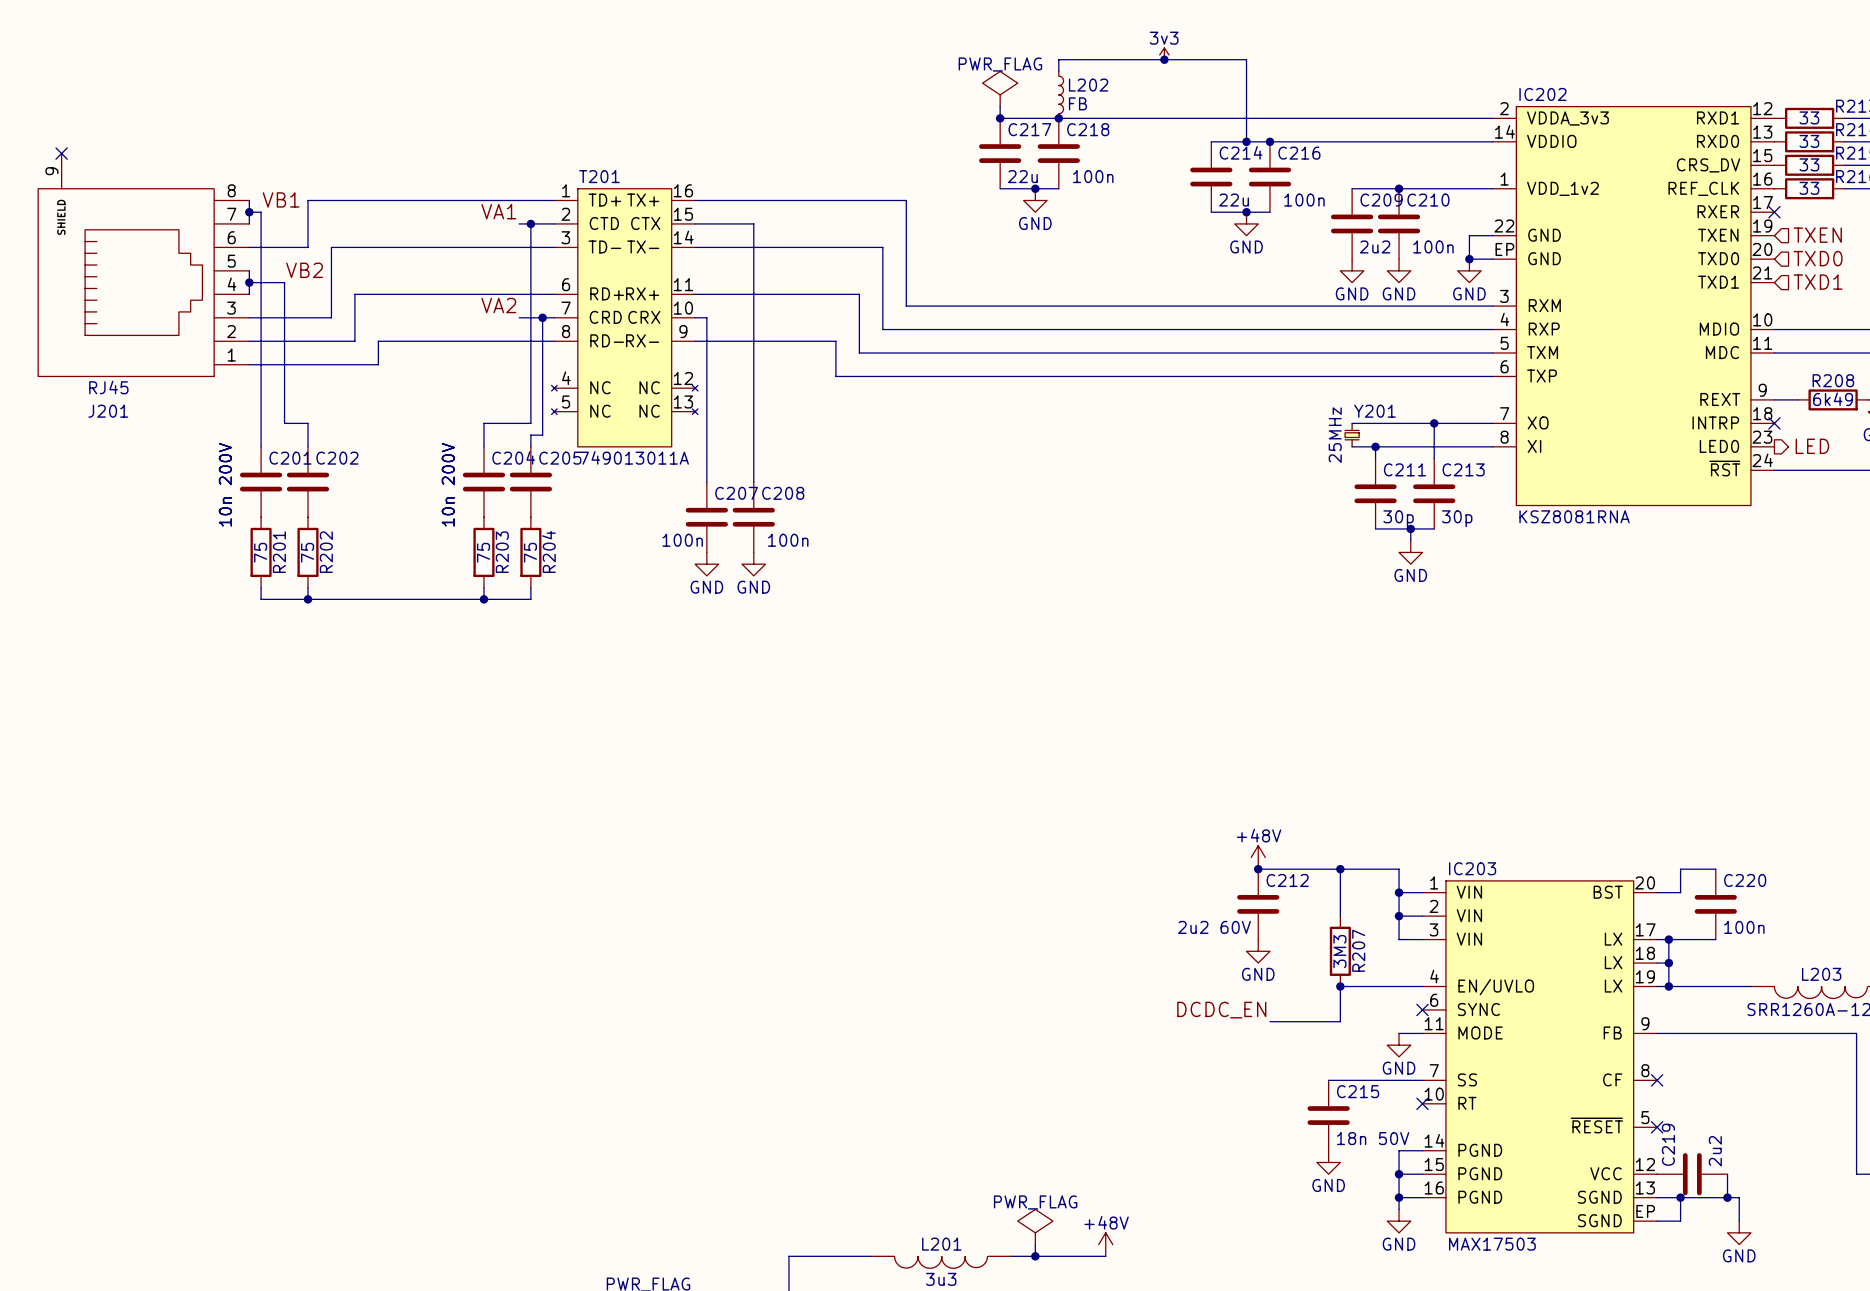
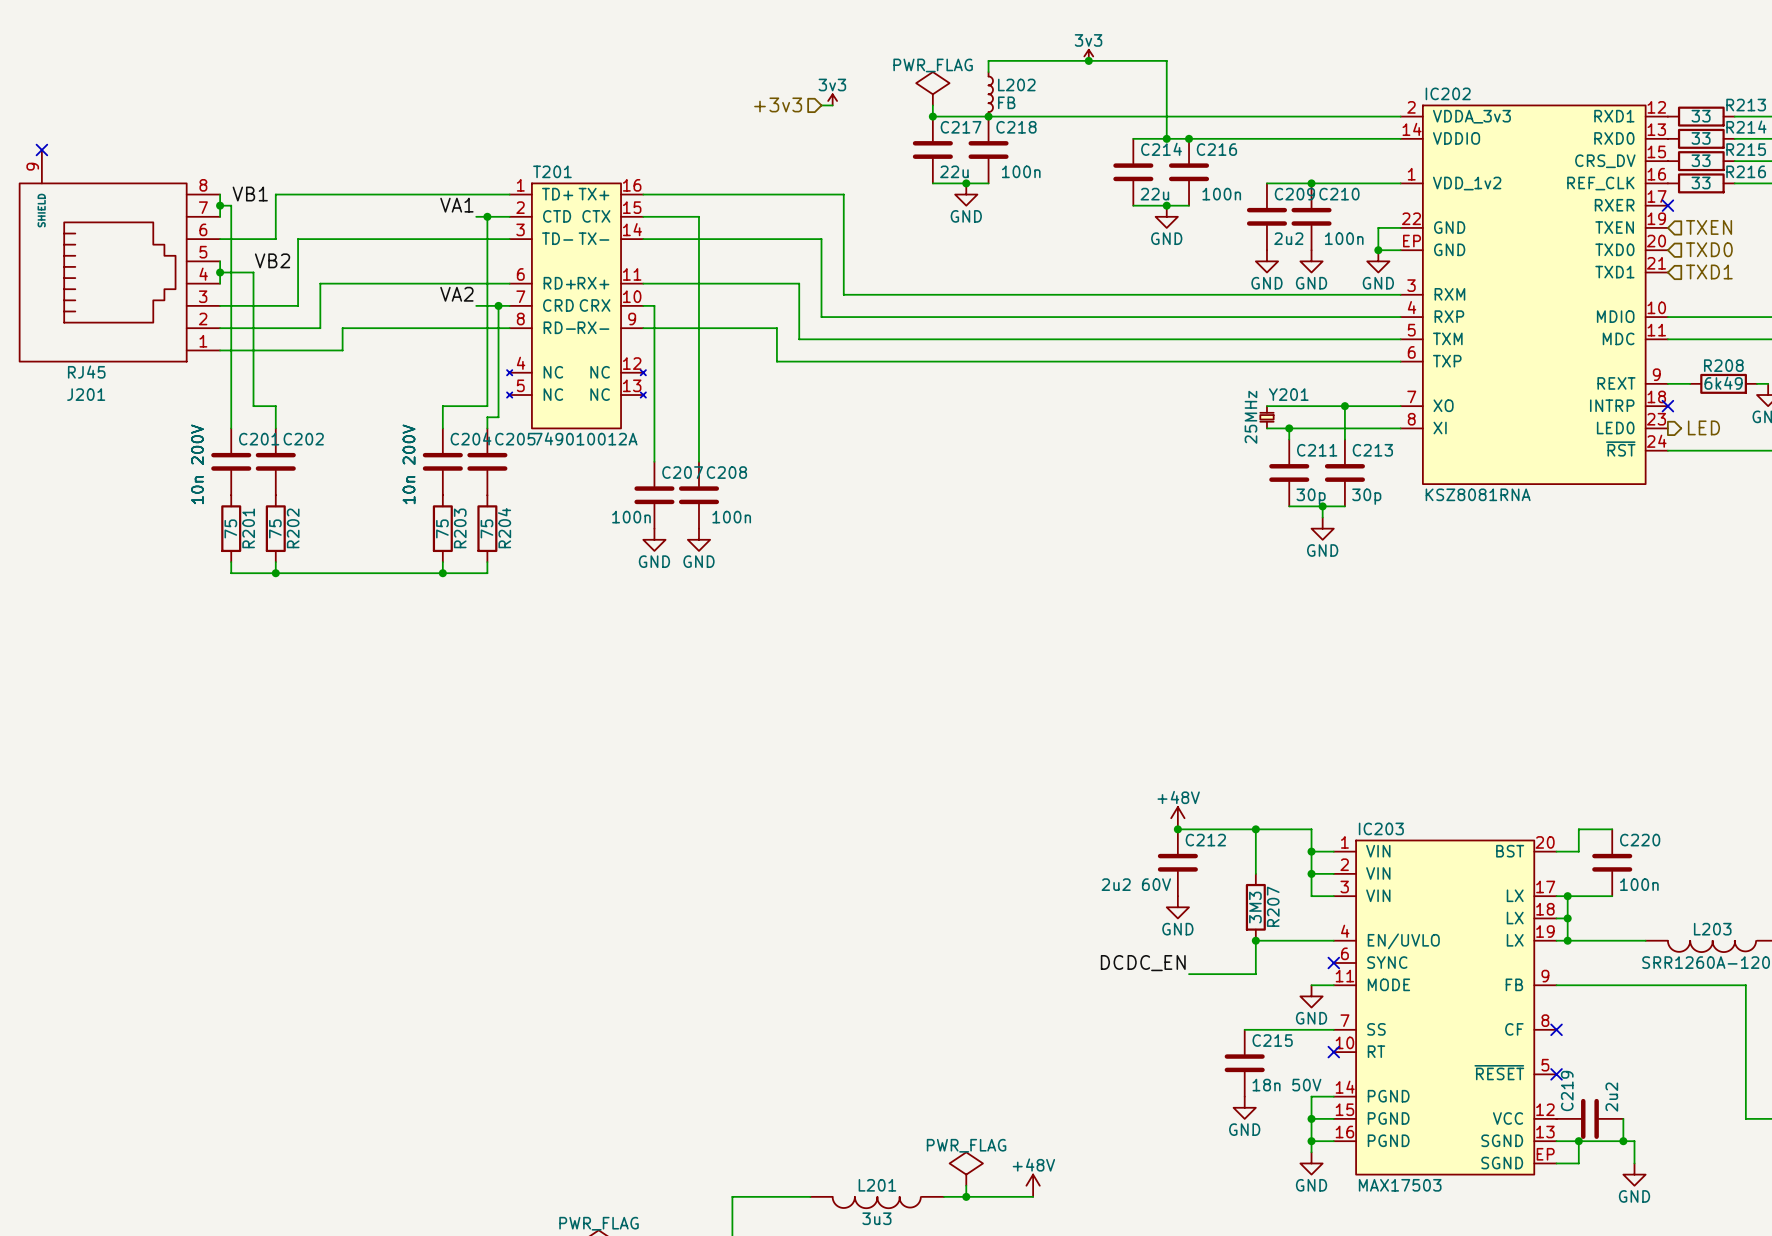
power symbol: none -> 3v3 (832, 99)
hierarchical label: none -> +3v3 (778, 104)
wire: none -> (821, 105) (832, 105)
T201 value: 749013011A (634, 457) -> 749010012A (585, 438)

